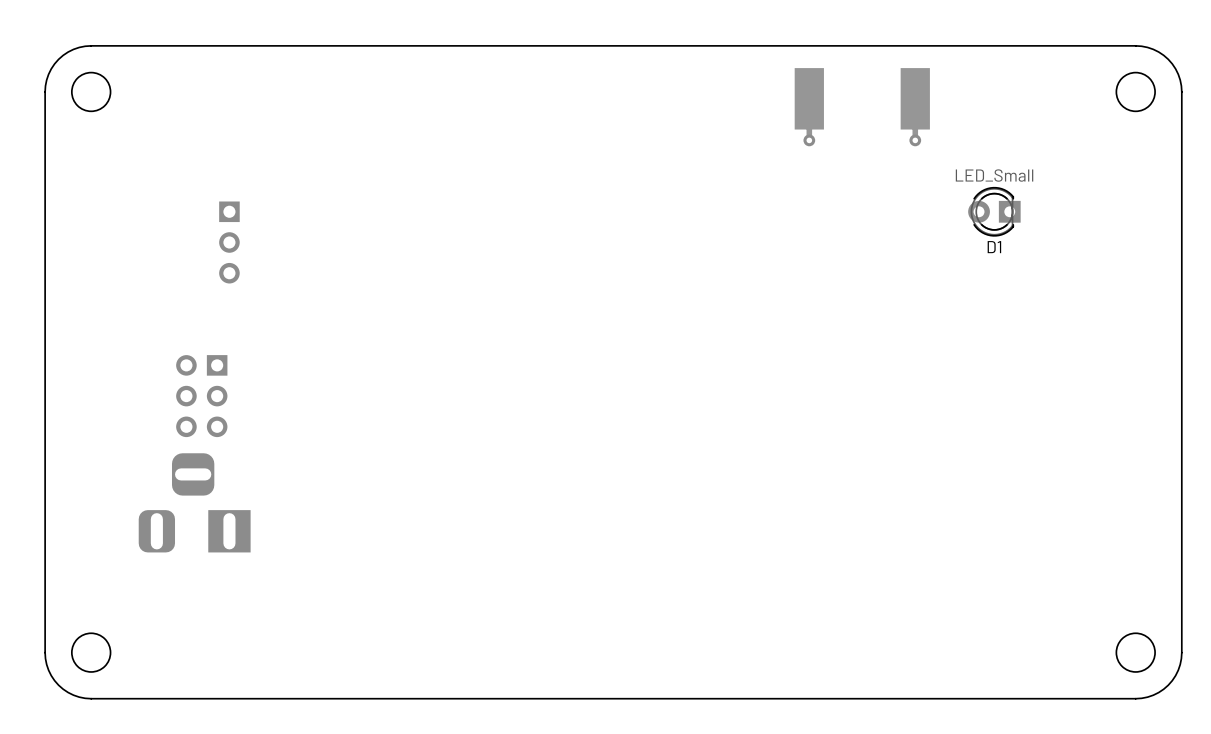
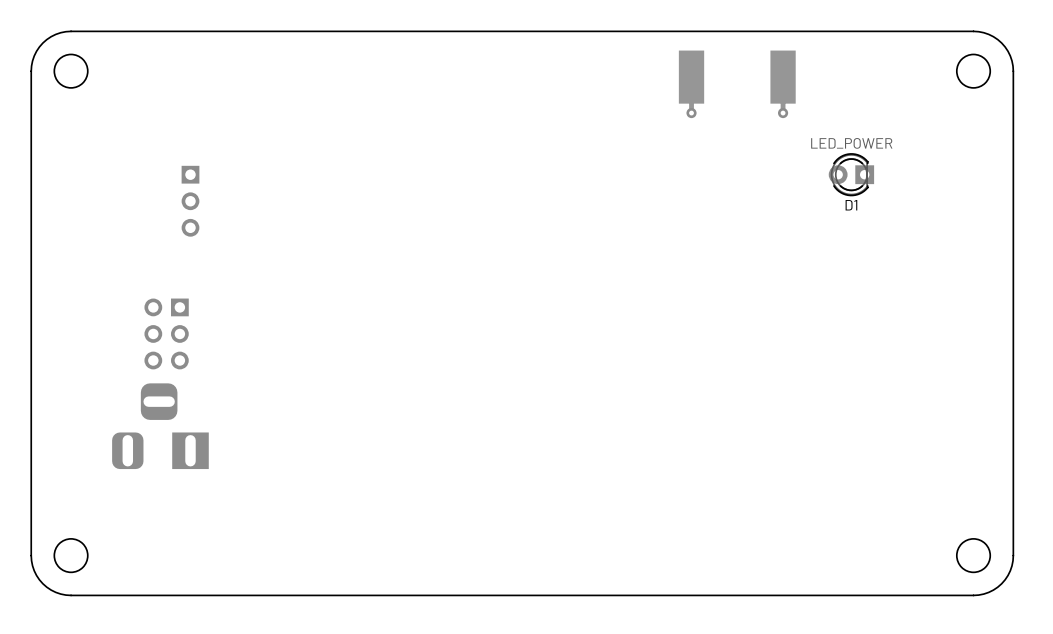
D1 value: LED_Small (994, 175) -> LED_POWER (851, 143)

